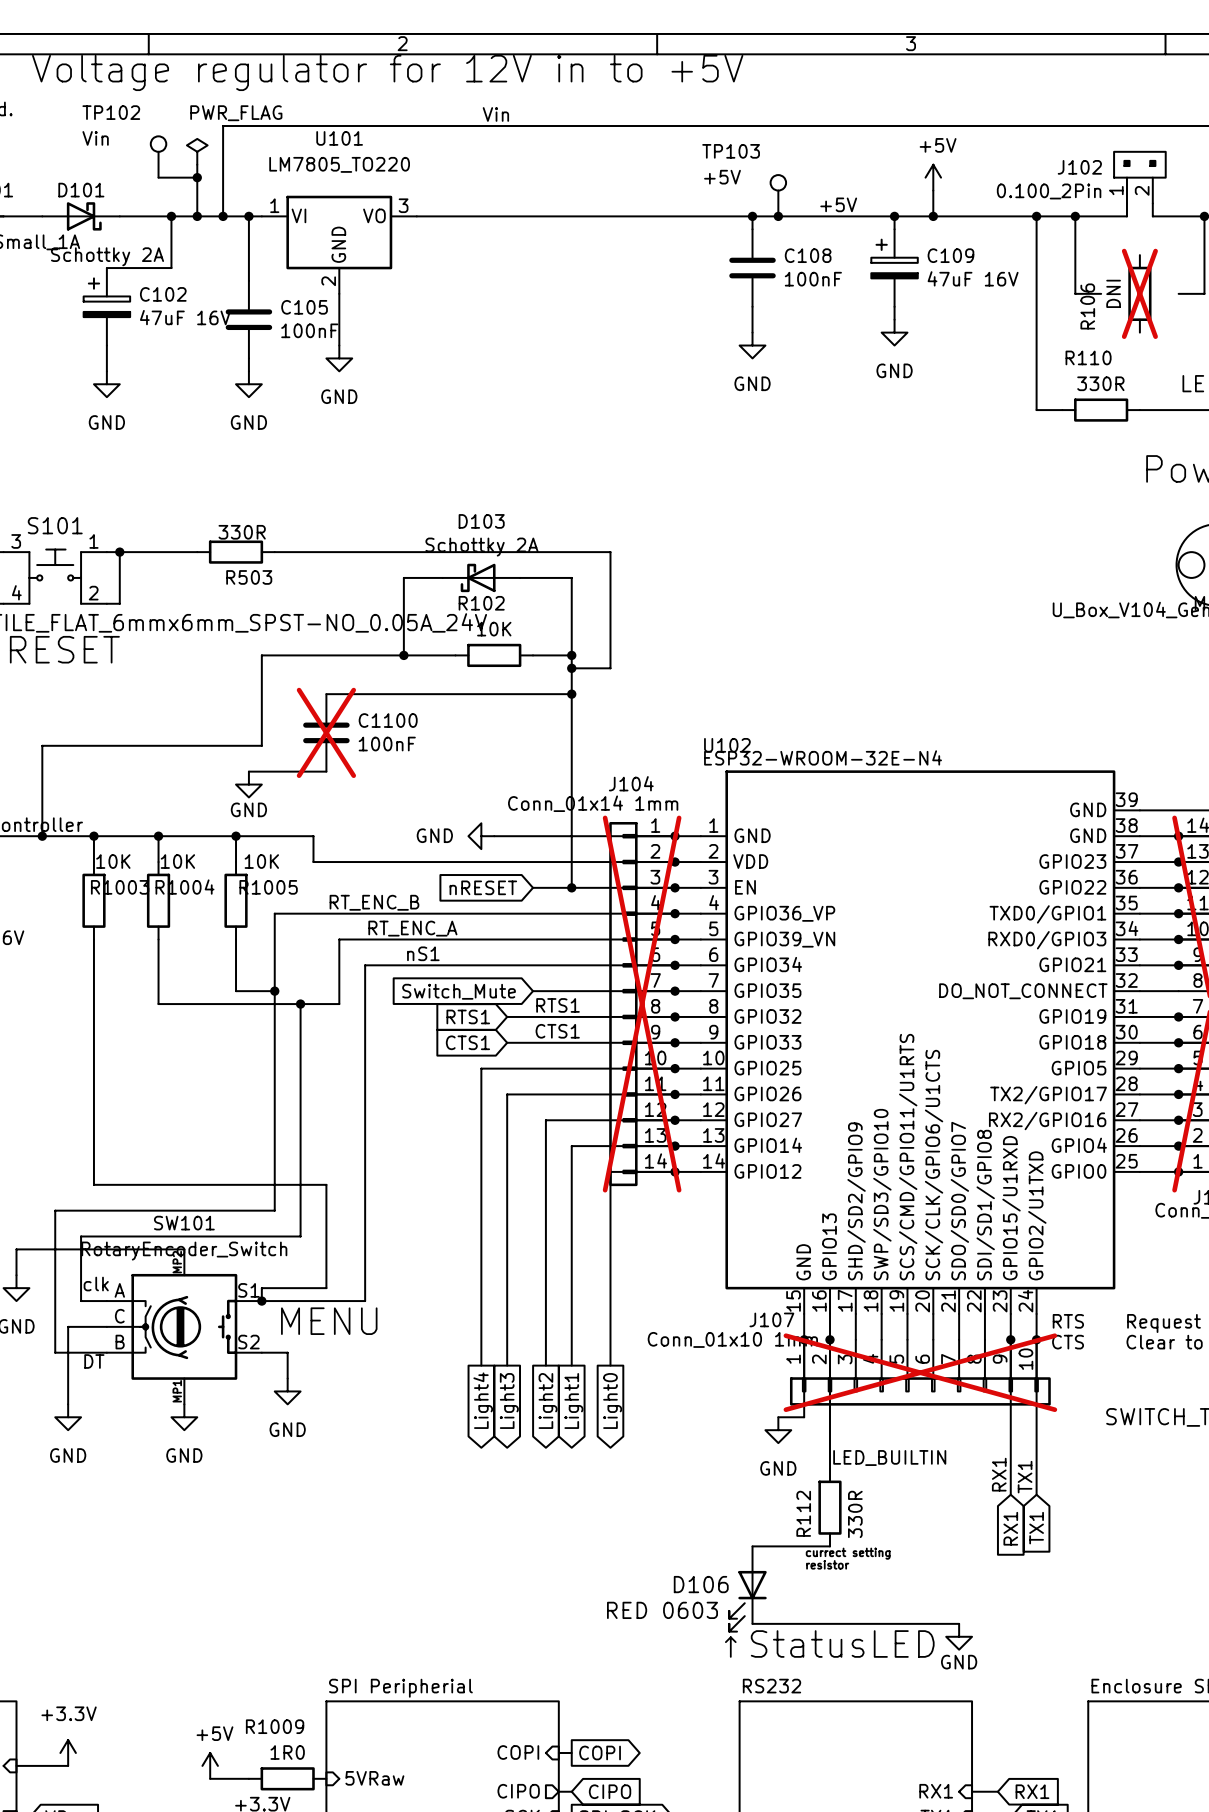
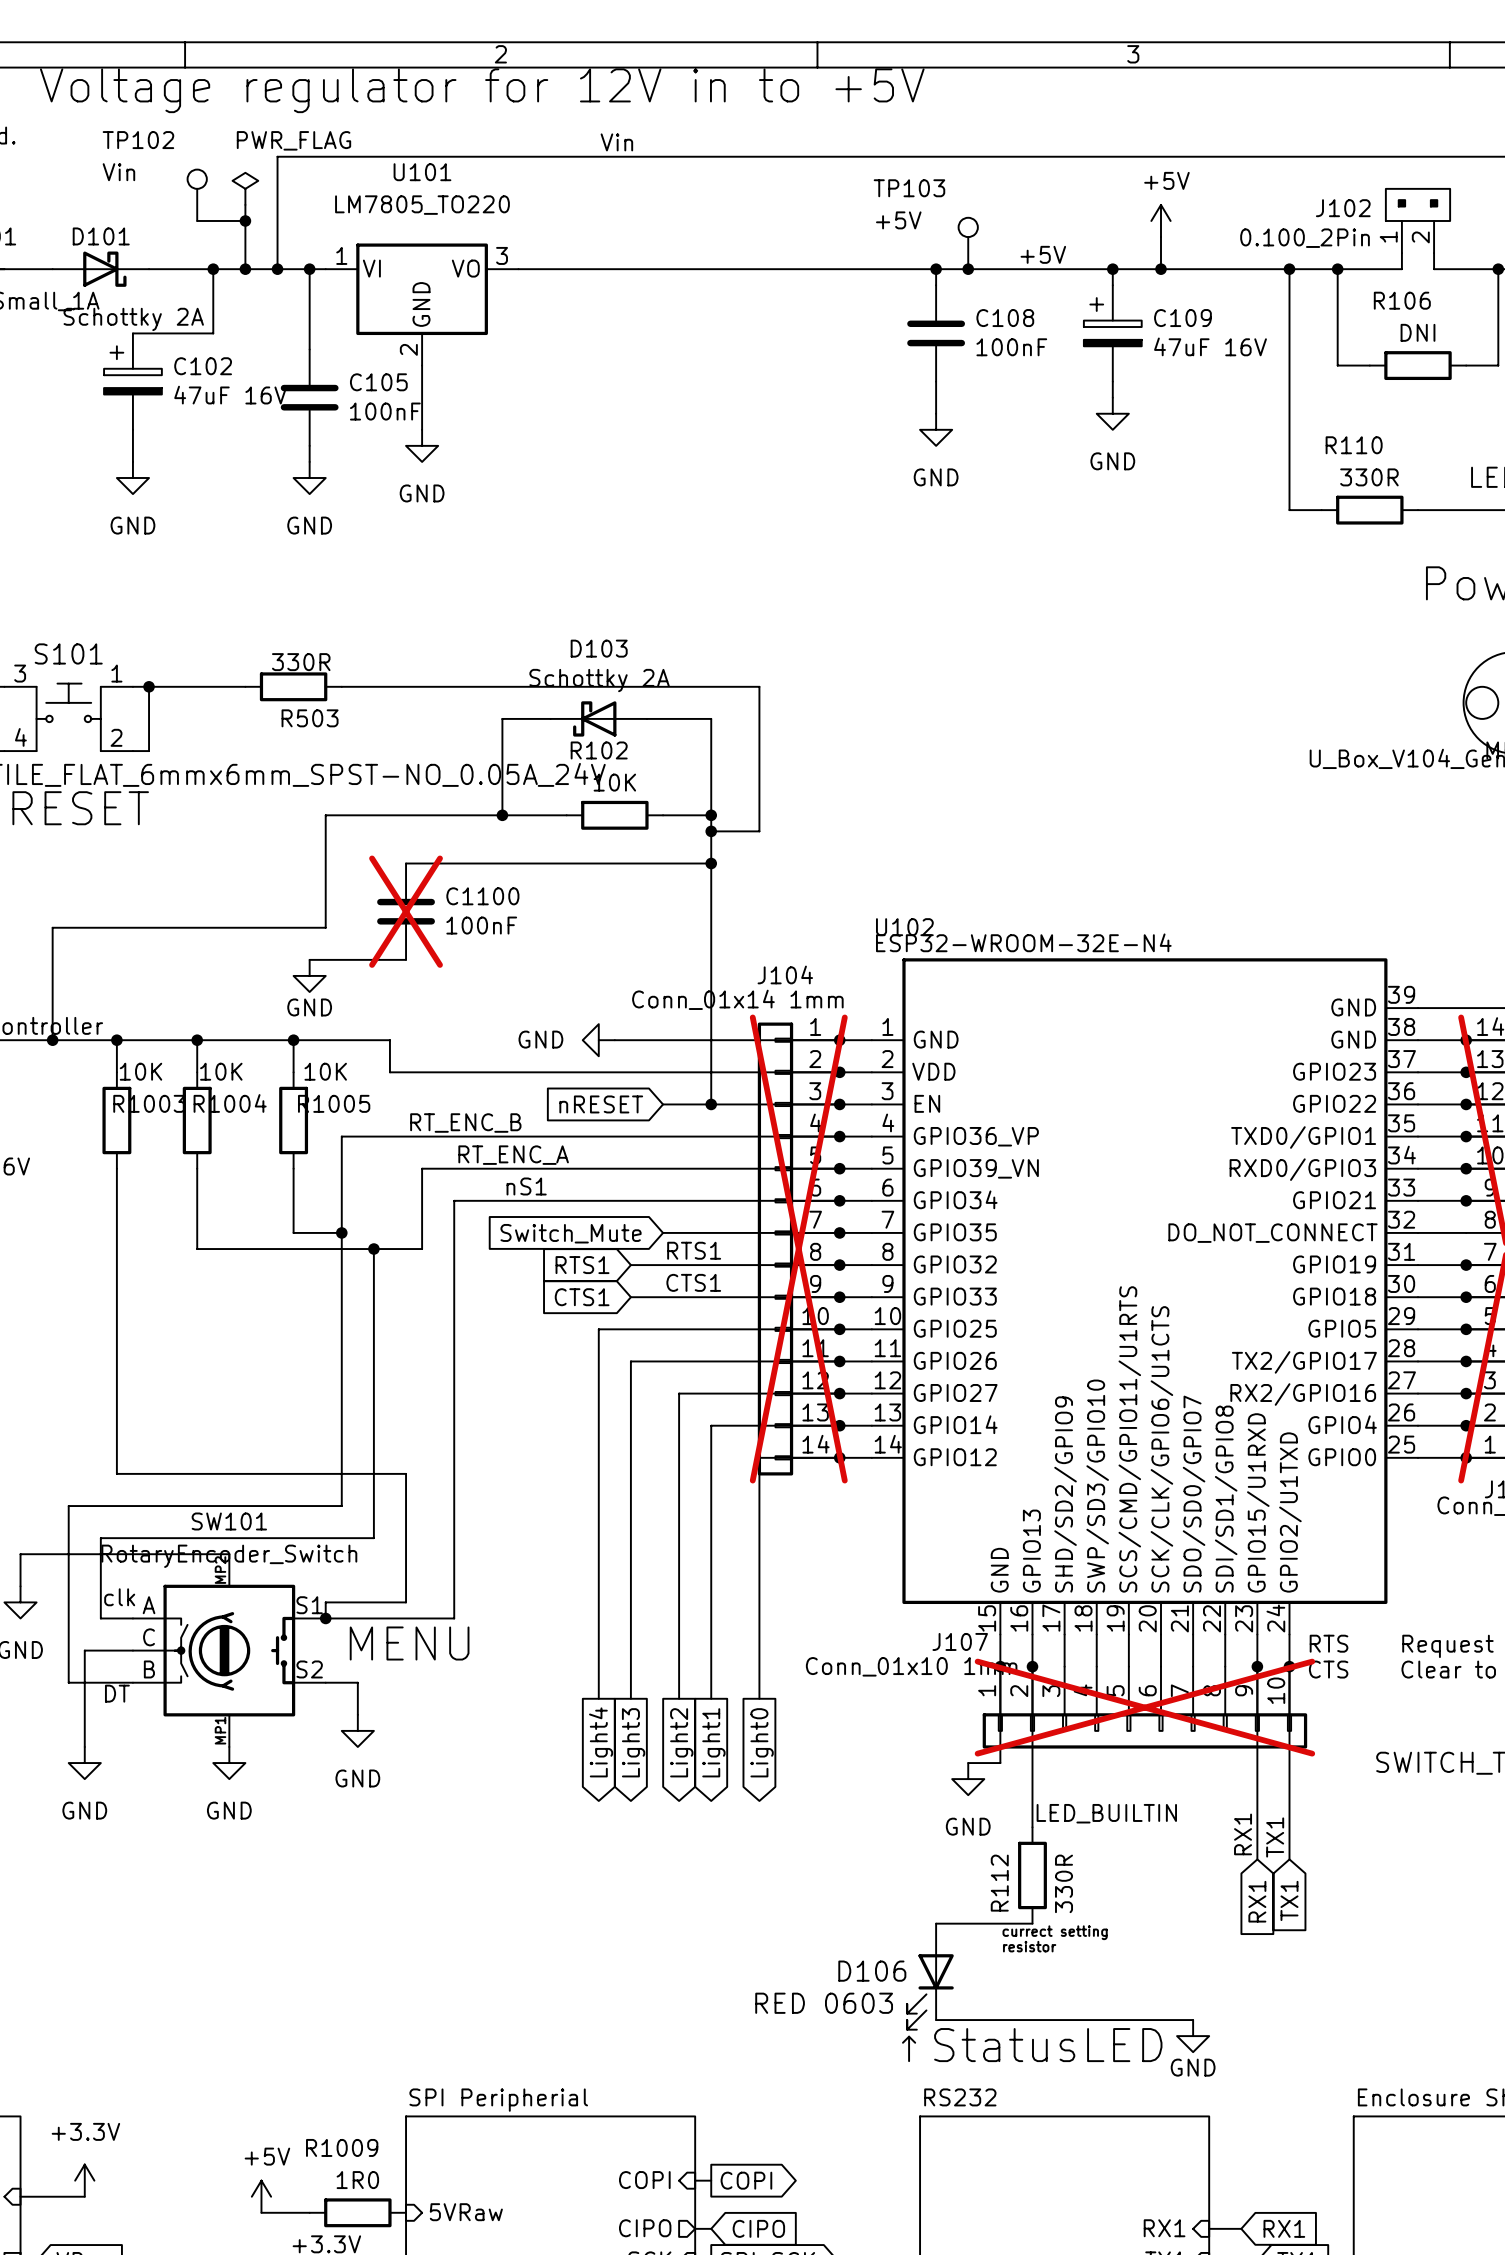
R106 rotation: 0° (1139, 293) -> 90° clockwise (1418, 365)
R106 do-not-place cross: (1139, 293) -> none

